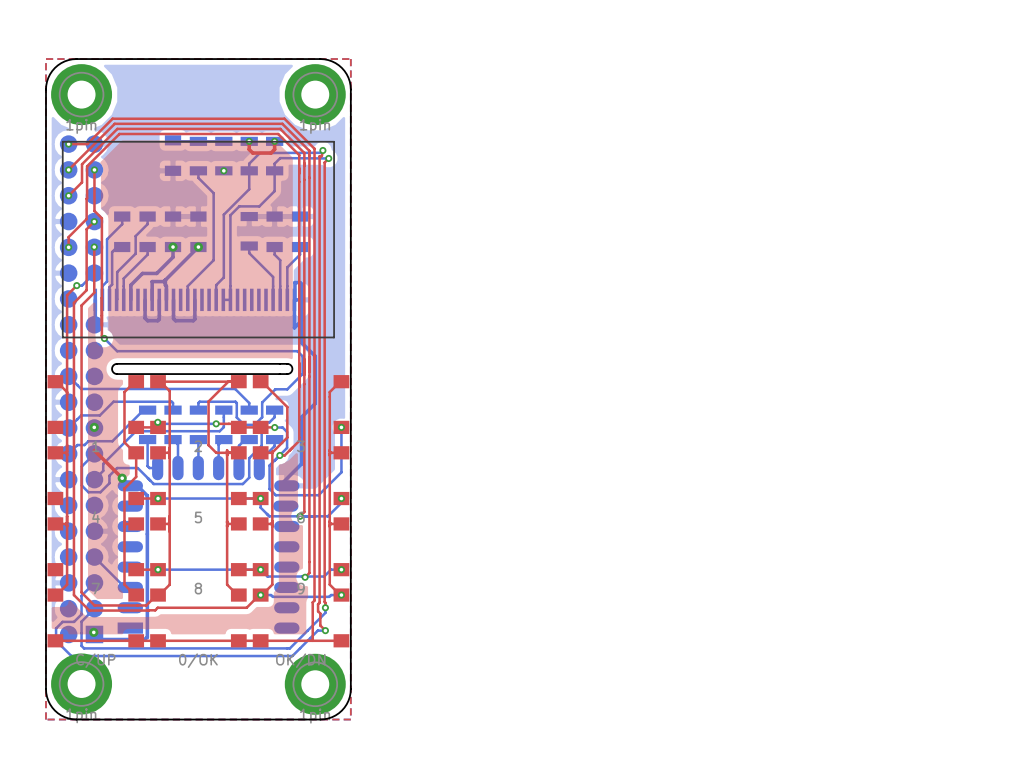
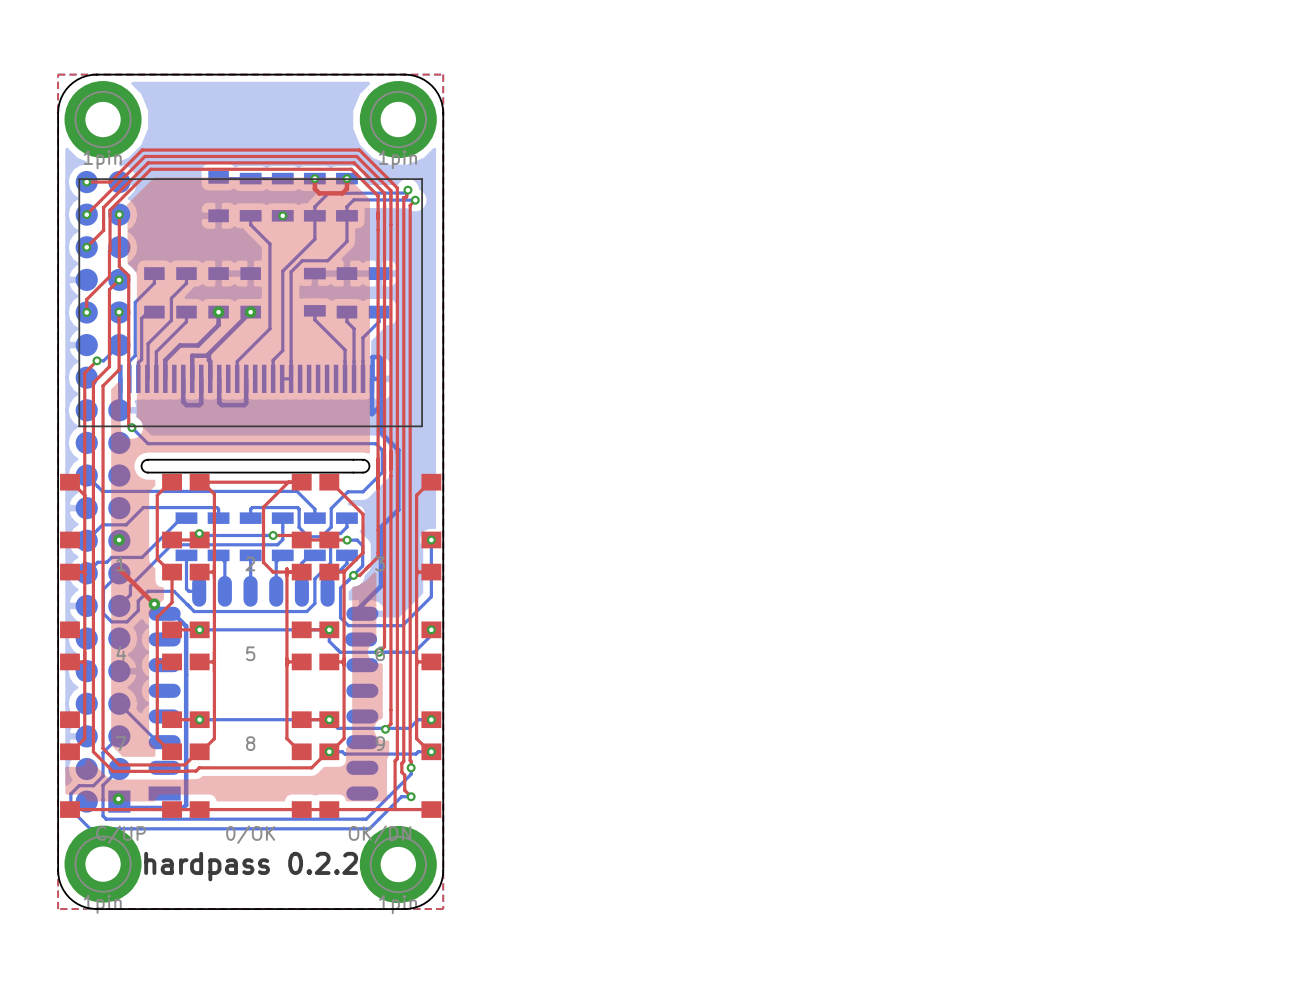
text: none -> hardpass 0.2.2 (251, 866)

